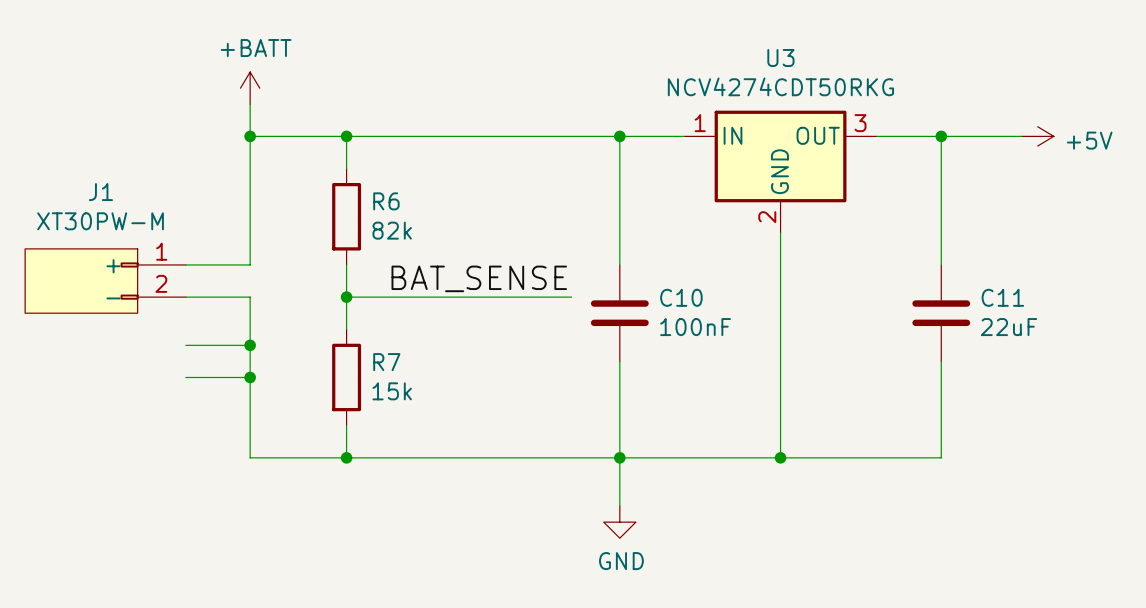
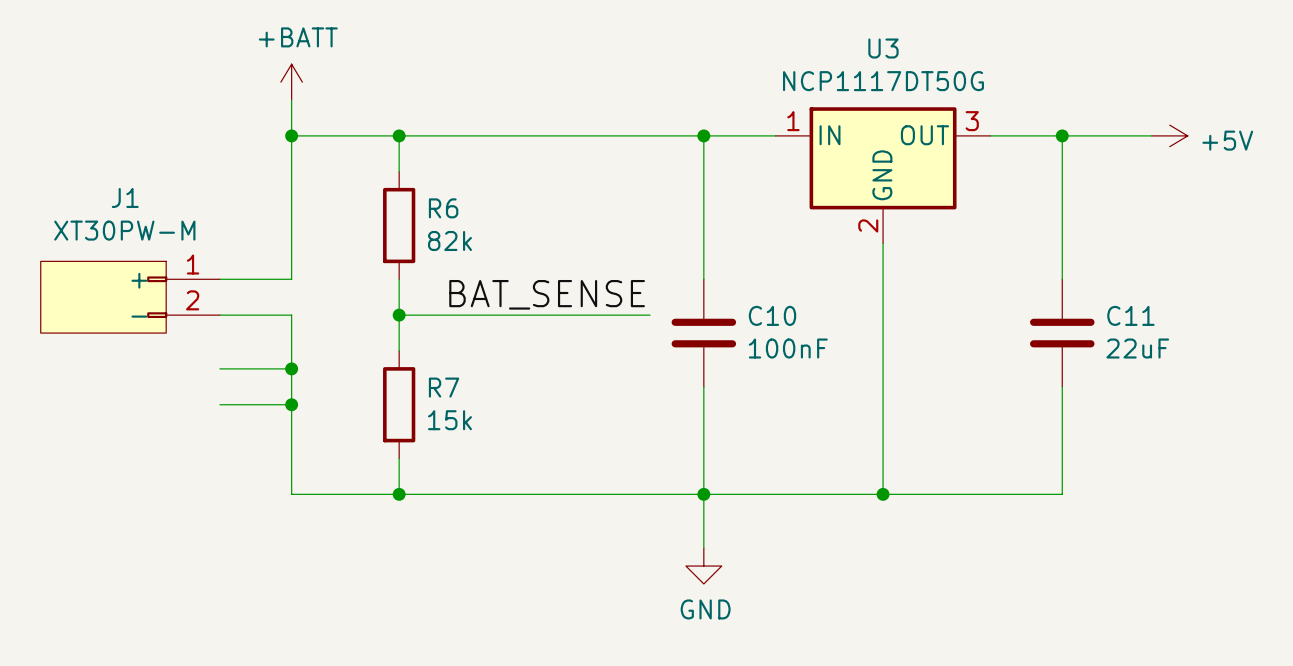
U3 value: NCV4274CDT50RKG (780, 86) -> NCP1117DT50G (883, 81)

